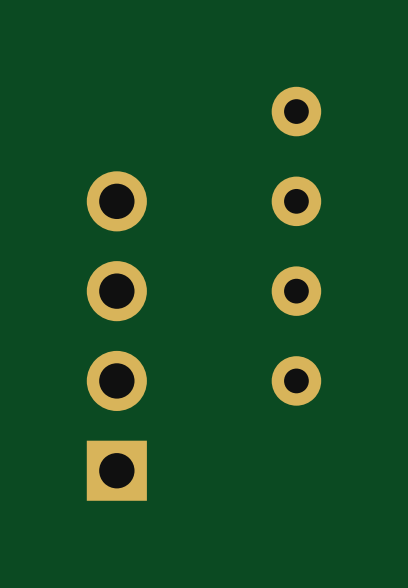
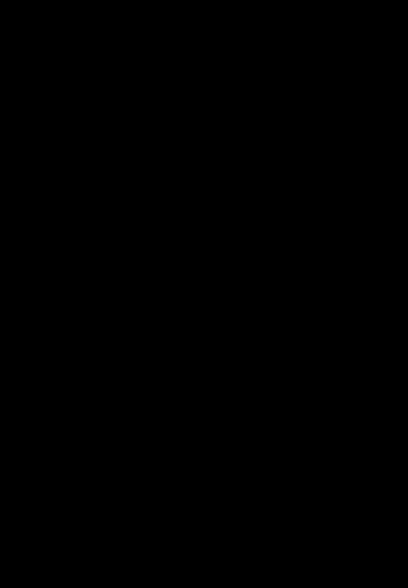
part: (296, 156) -> none
part: (116, 336) -> none
part: (296, 336) -> none

